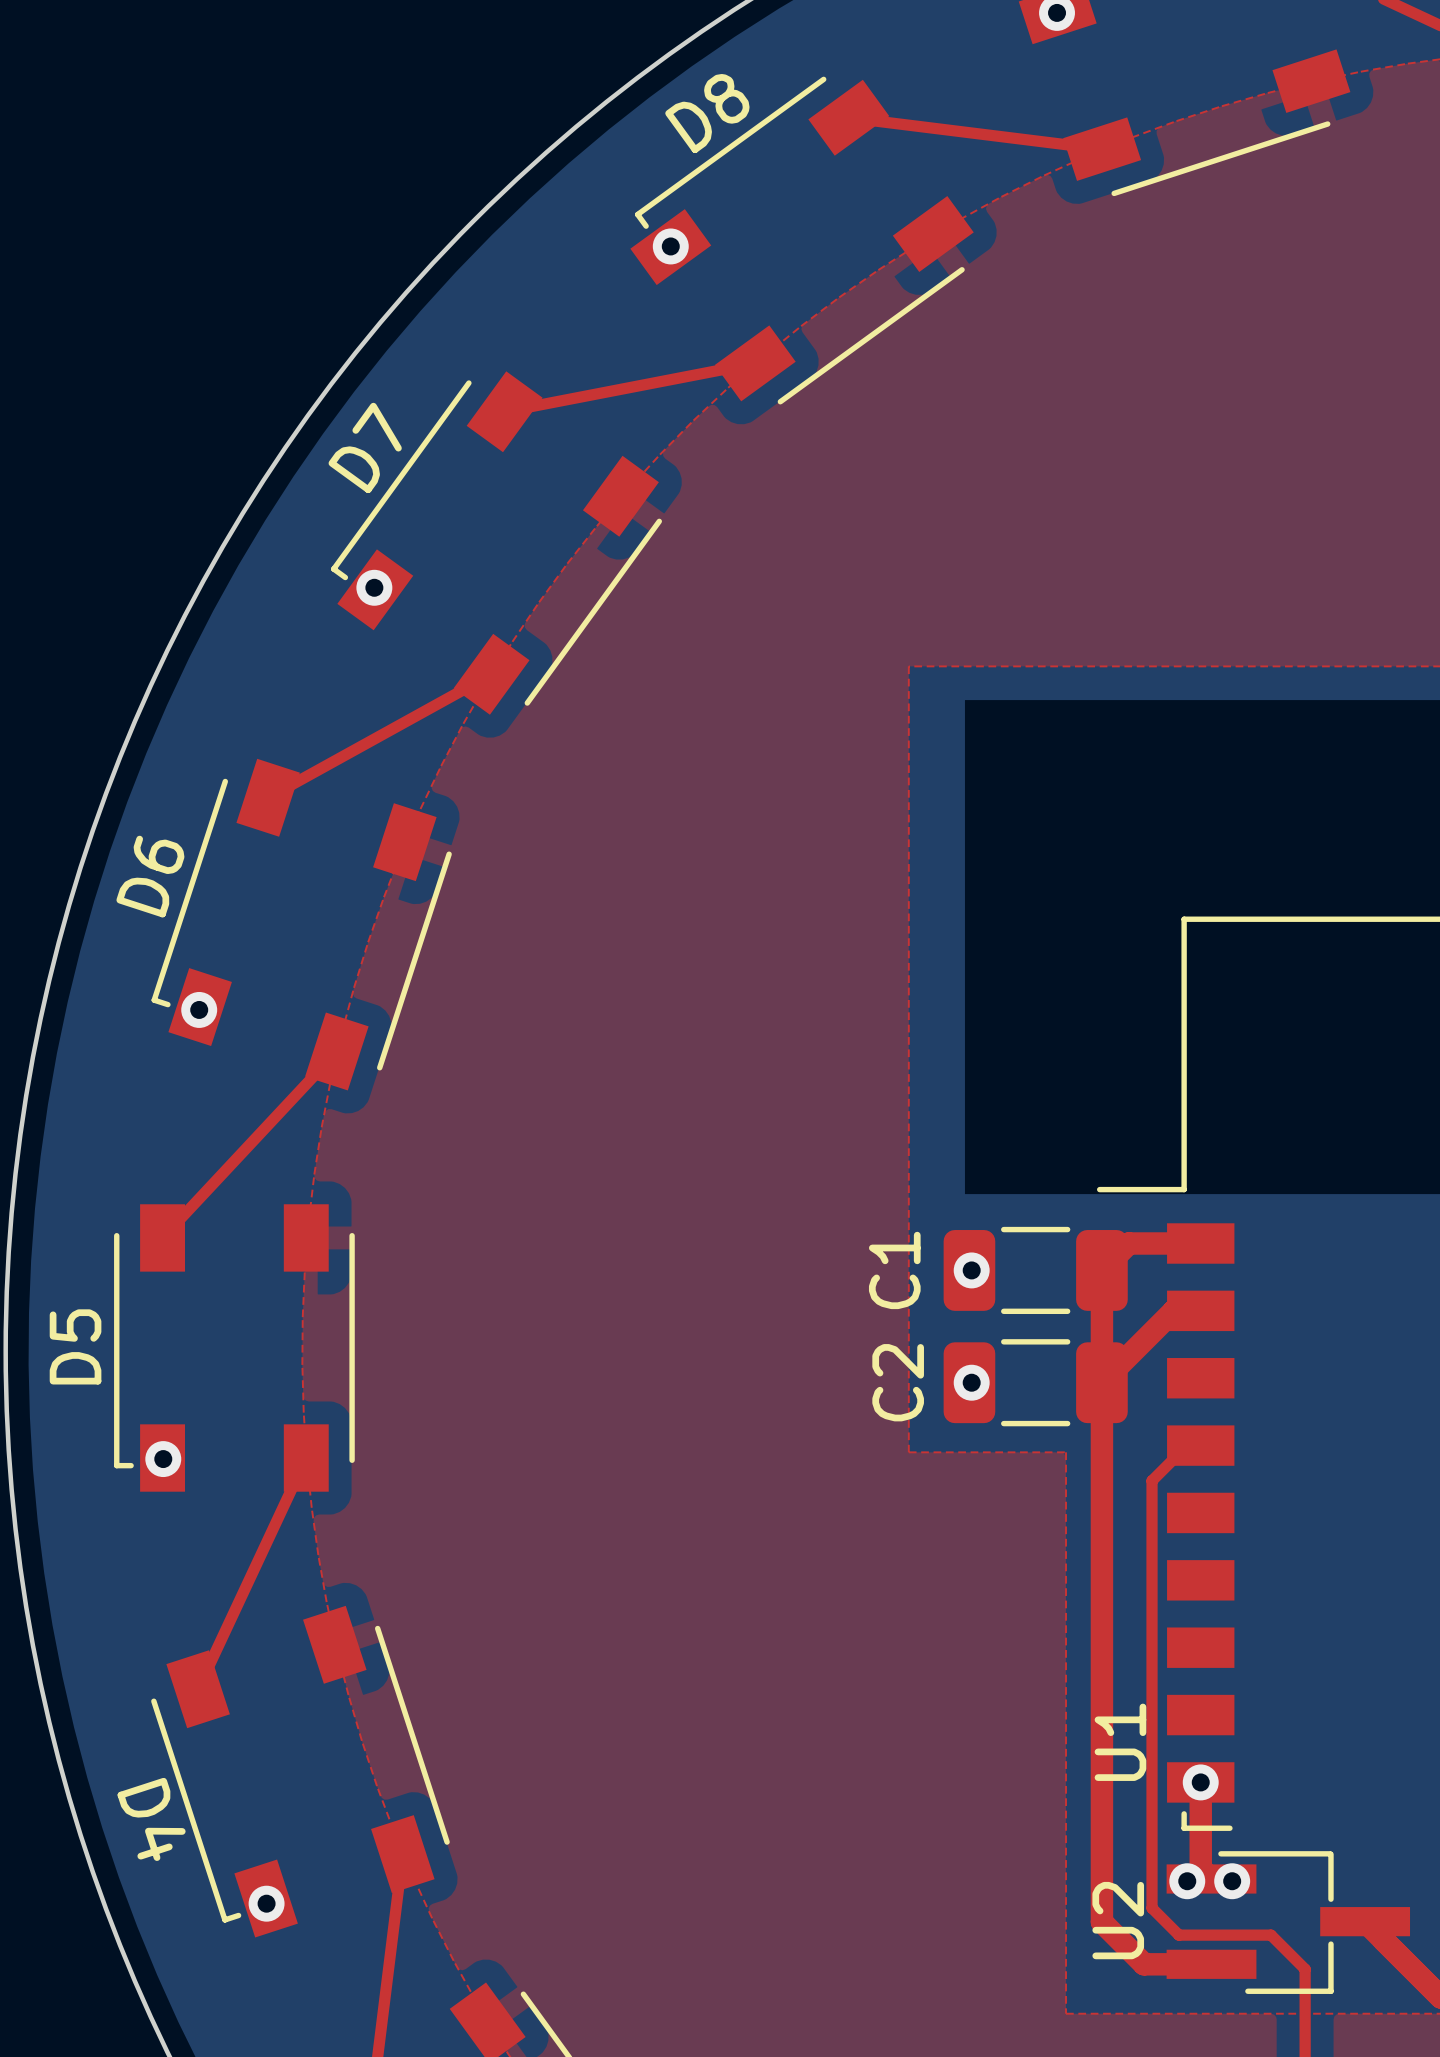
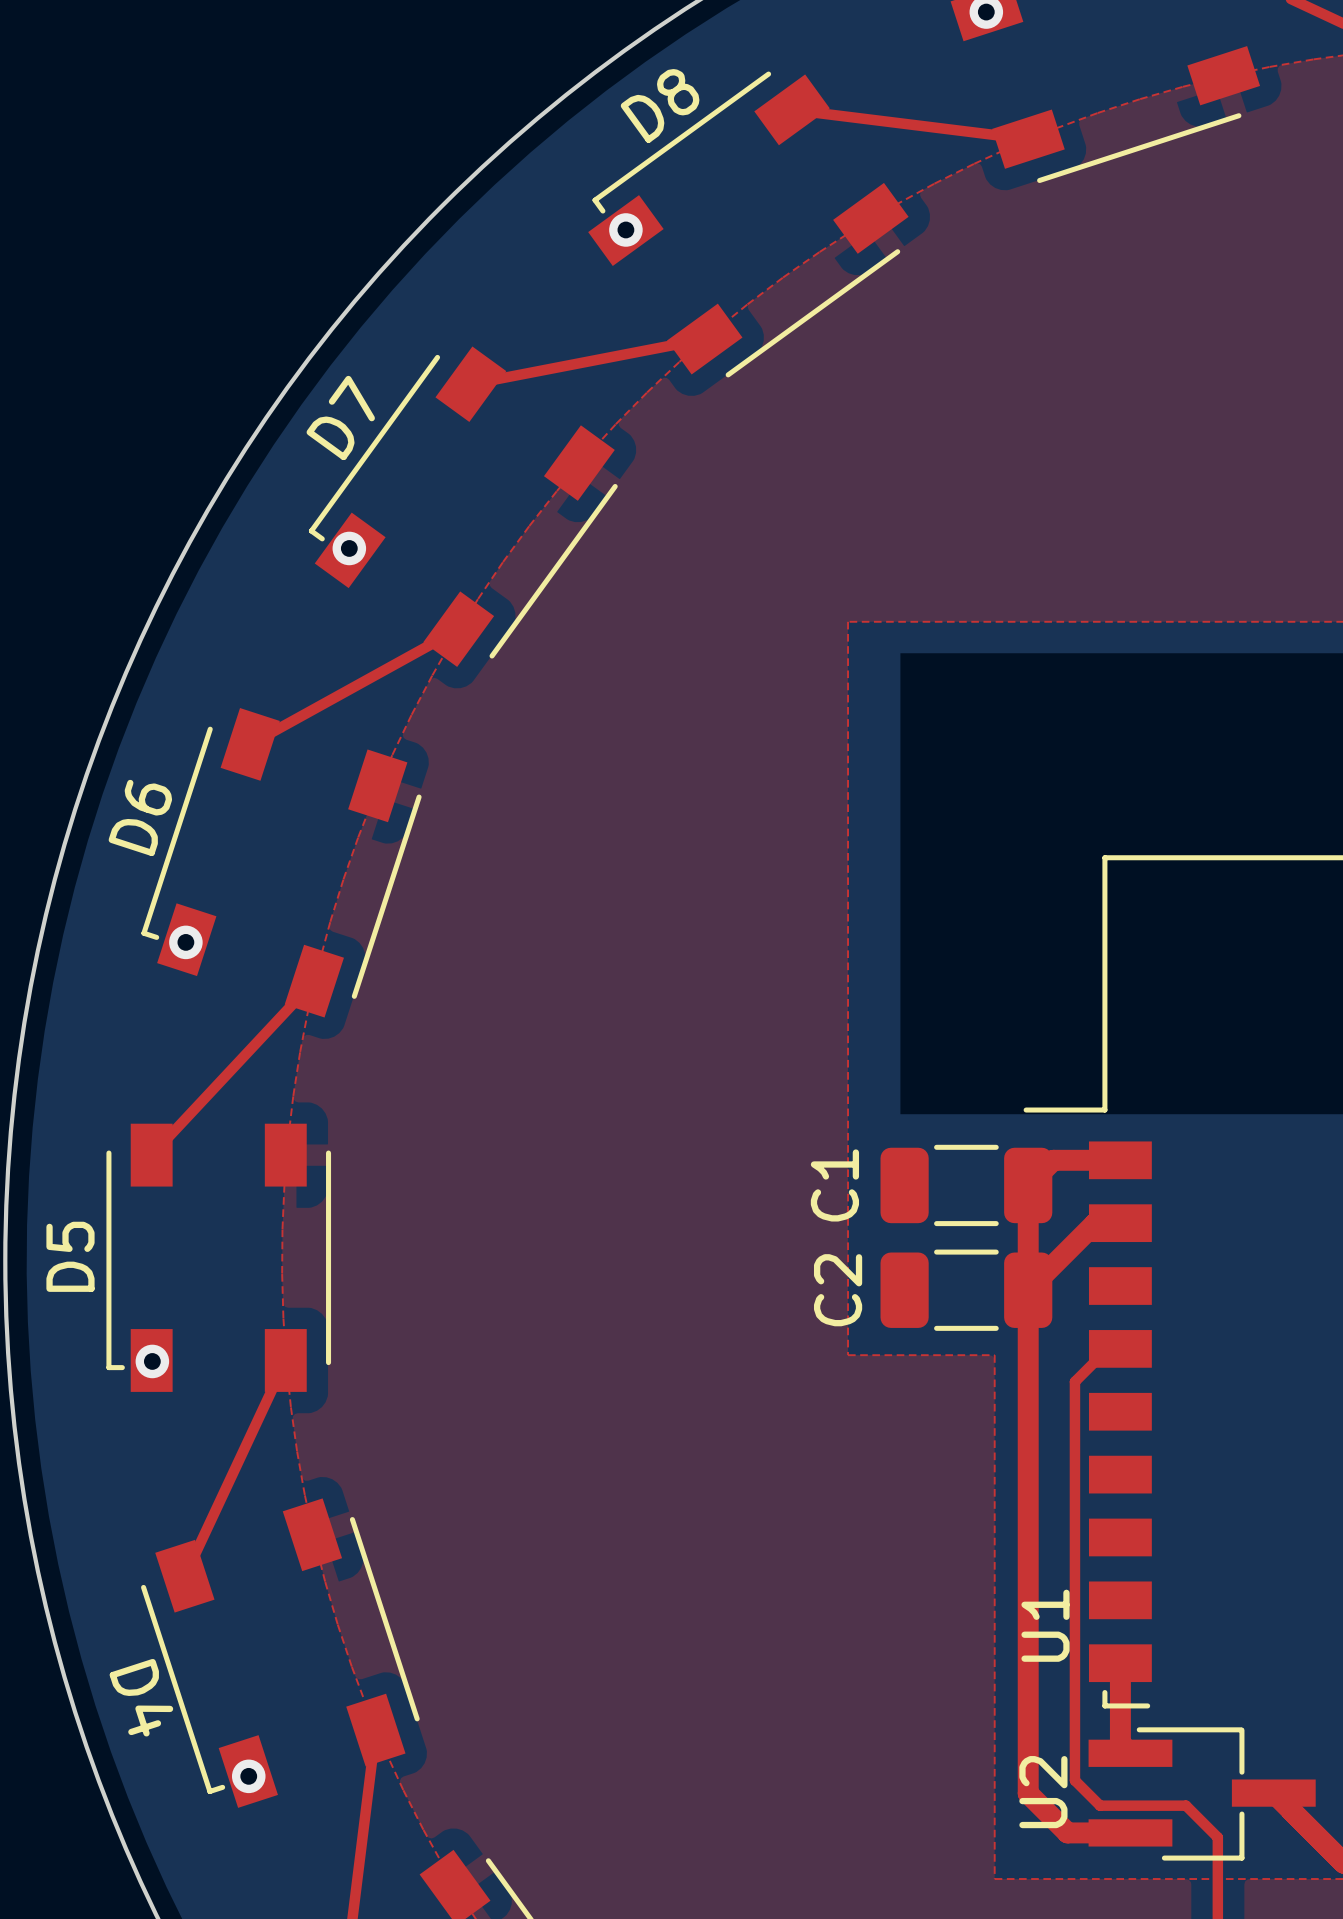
via: (971, 1270) -> none
via: (971, 1382) -> none
via: (1200, 1782) -> none
via: (1187, 1881) -> none
via: (1232, 1881) -> none

